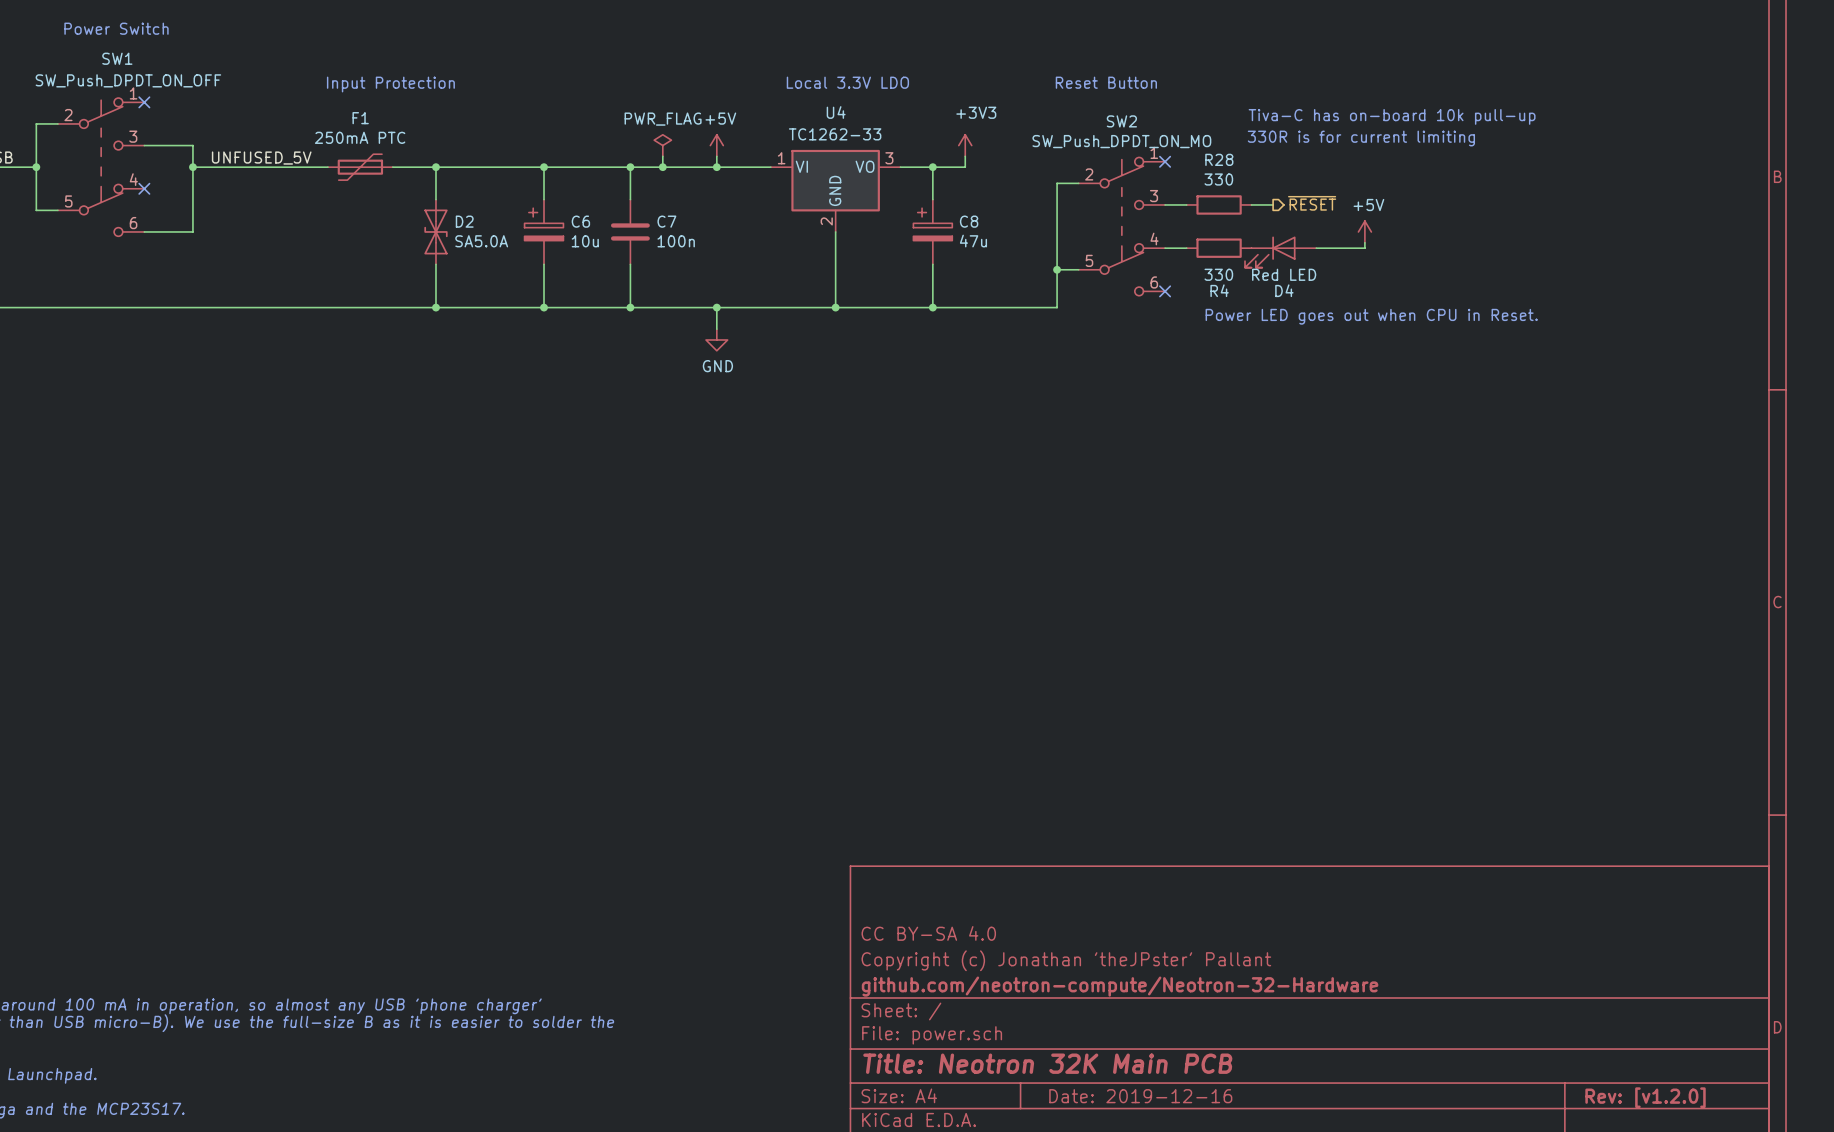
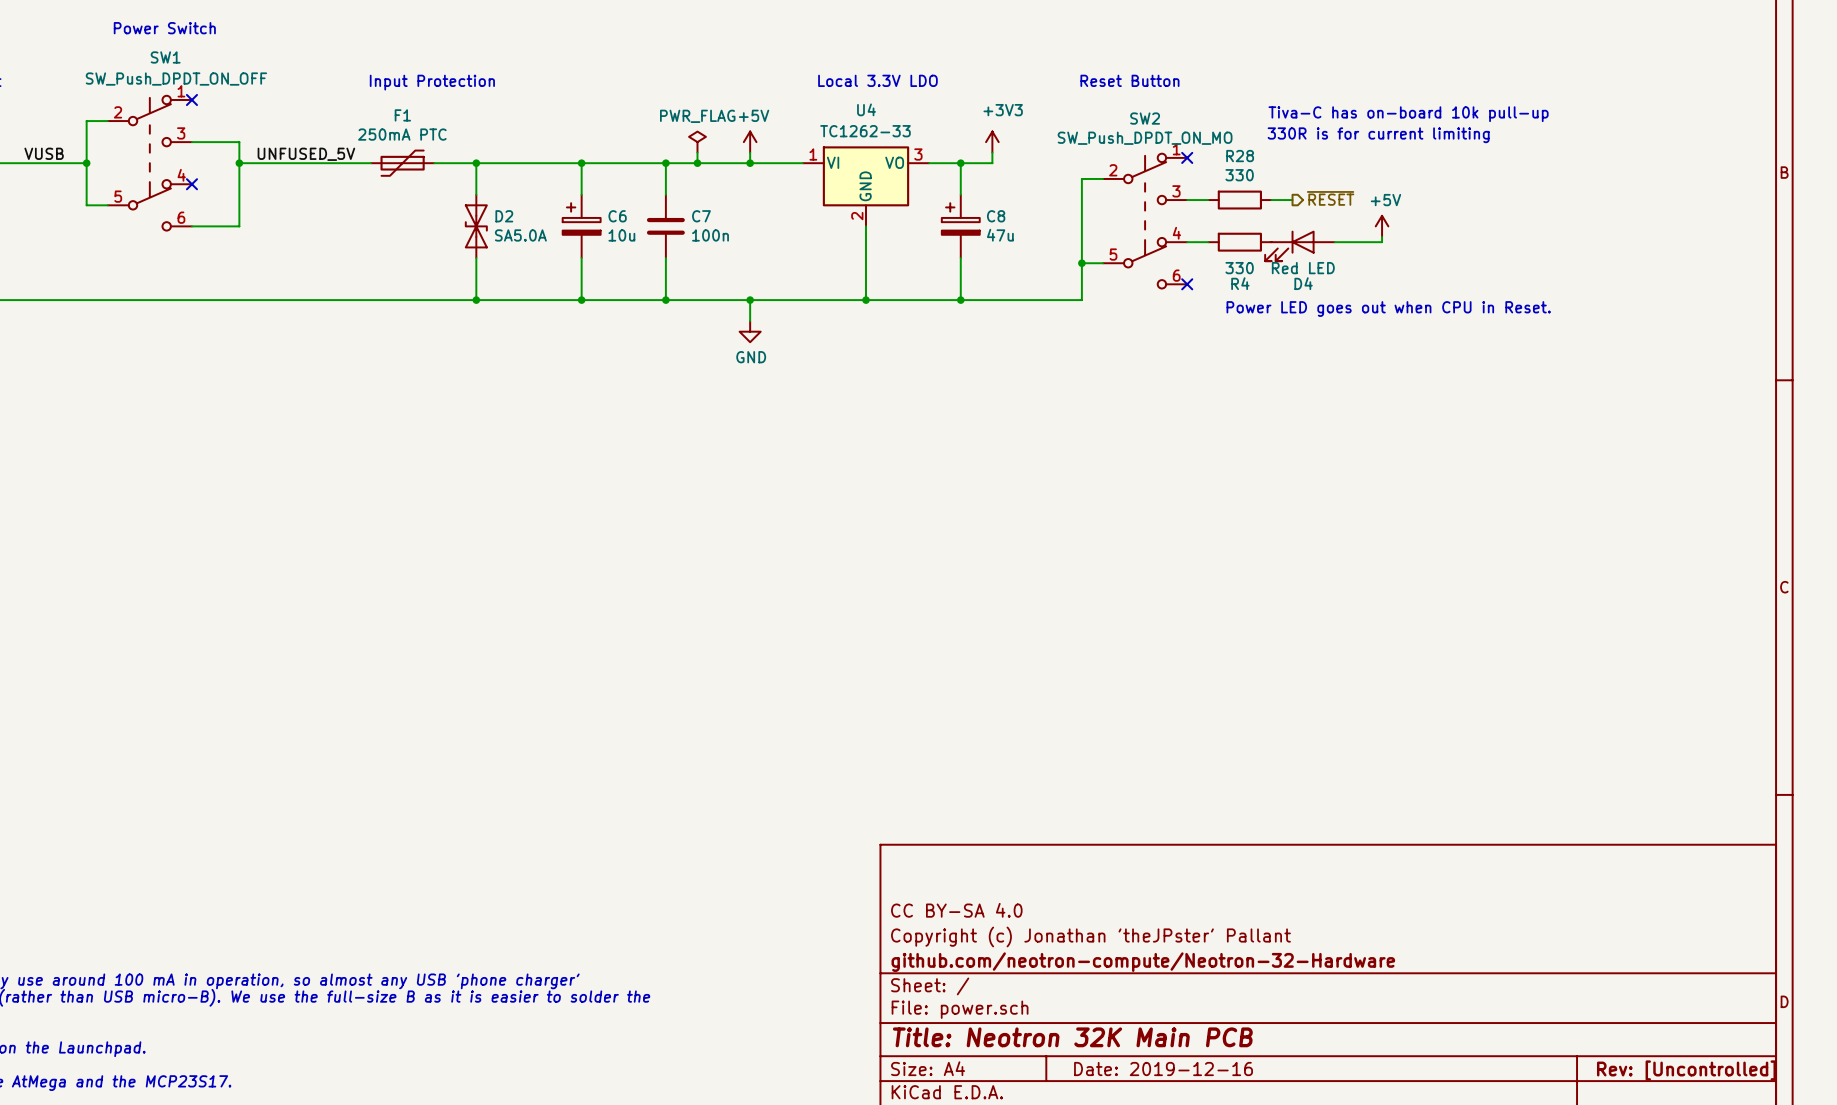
title block: Rev: [v1.2.0] (1645, 1097) -> Rev: [Uncontrolled] (1686, 1070)

